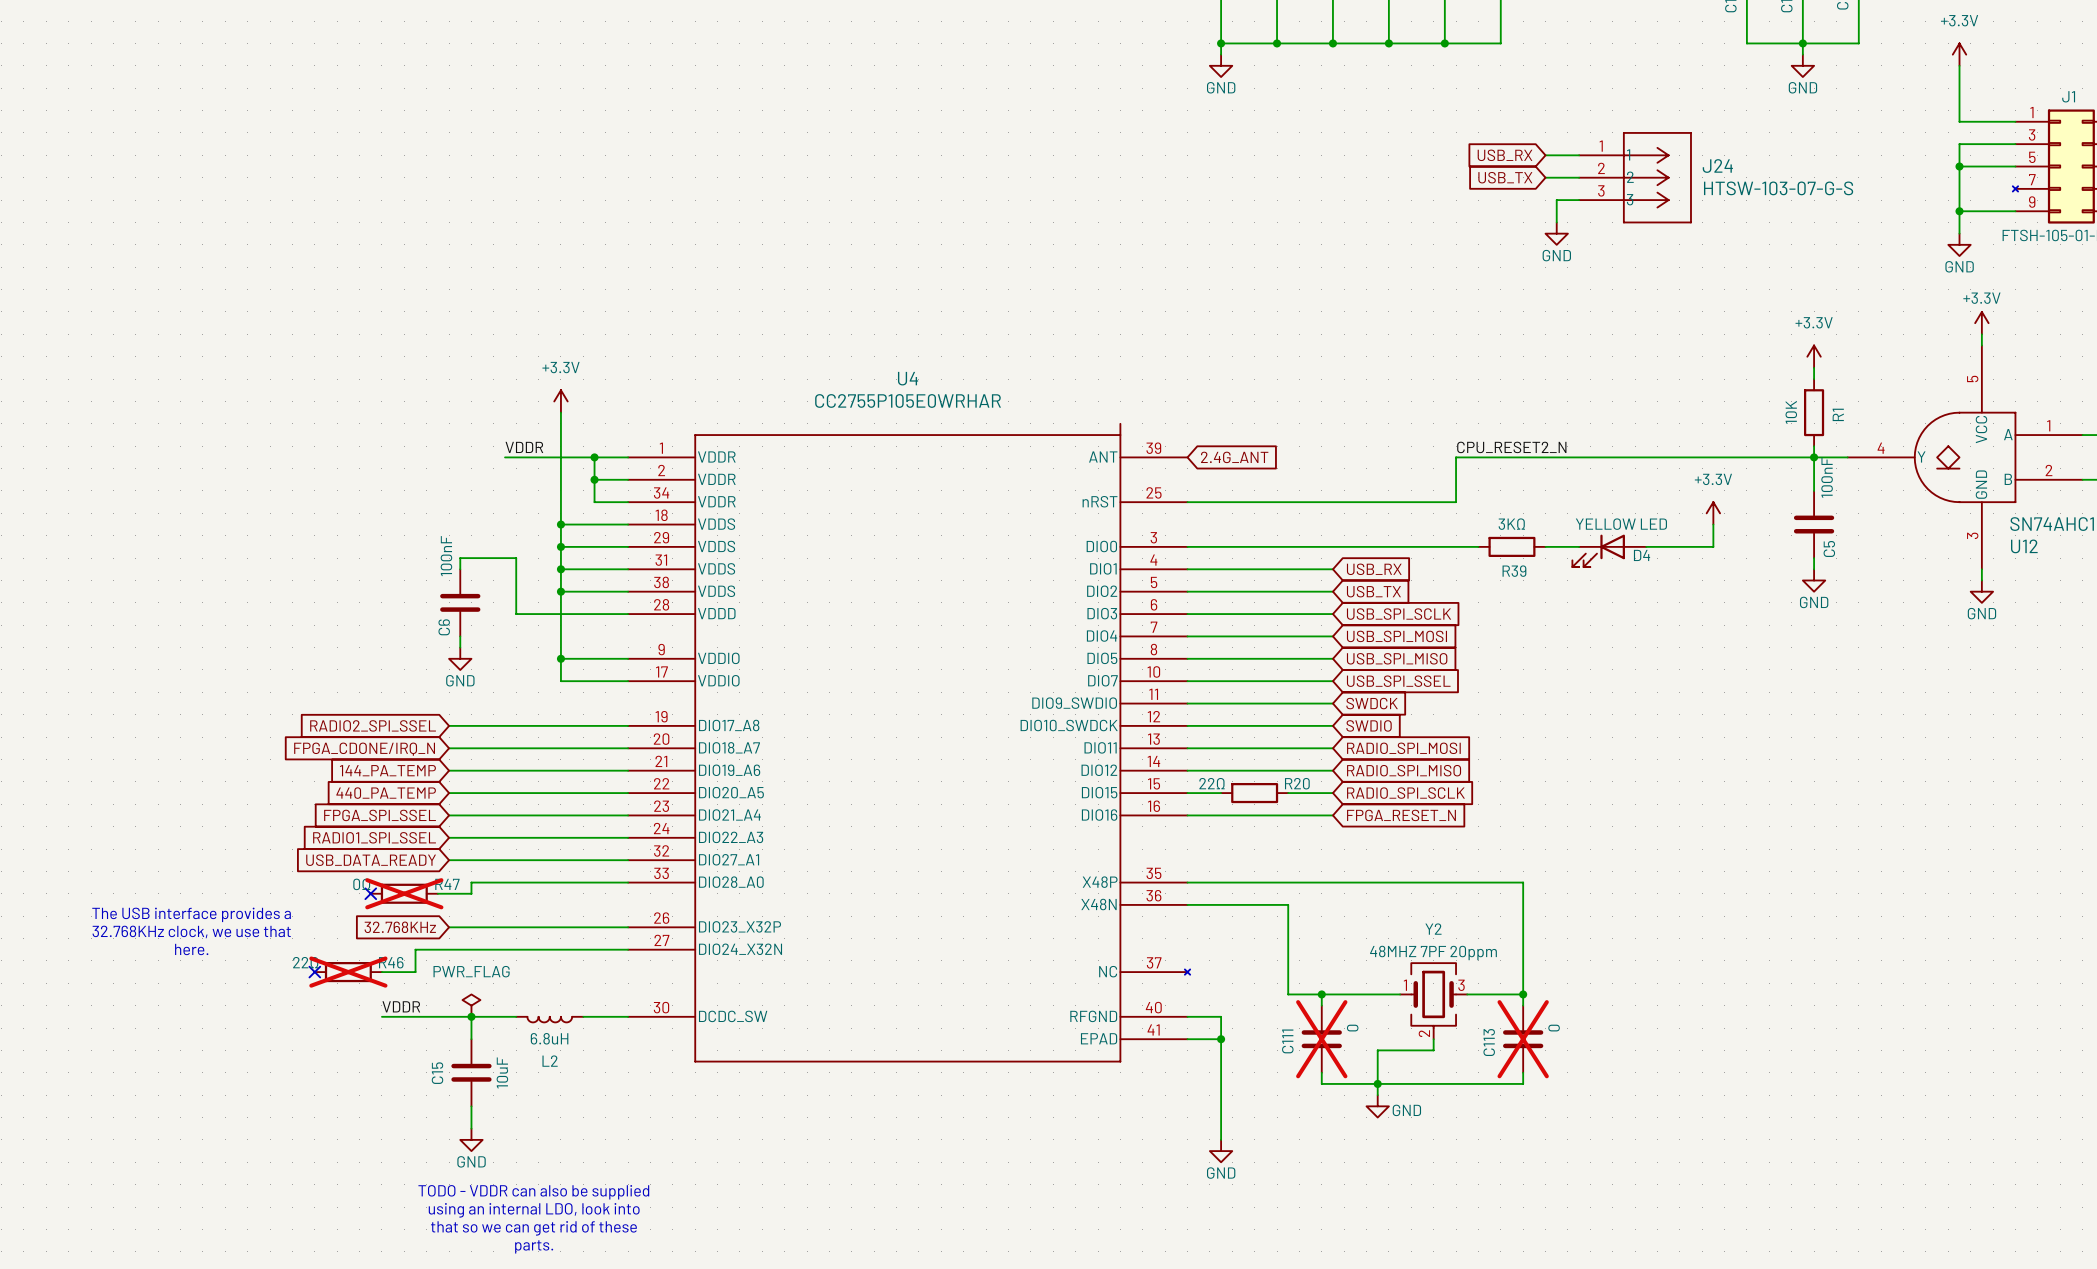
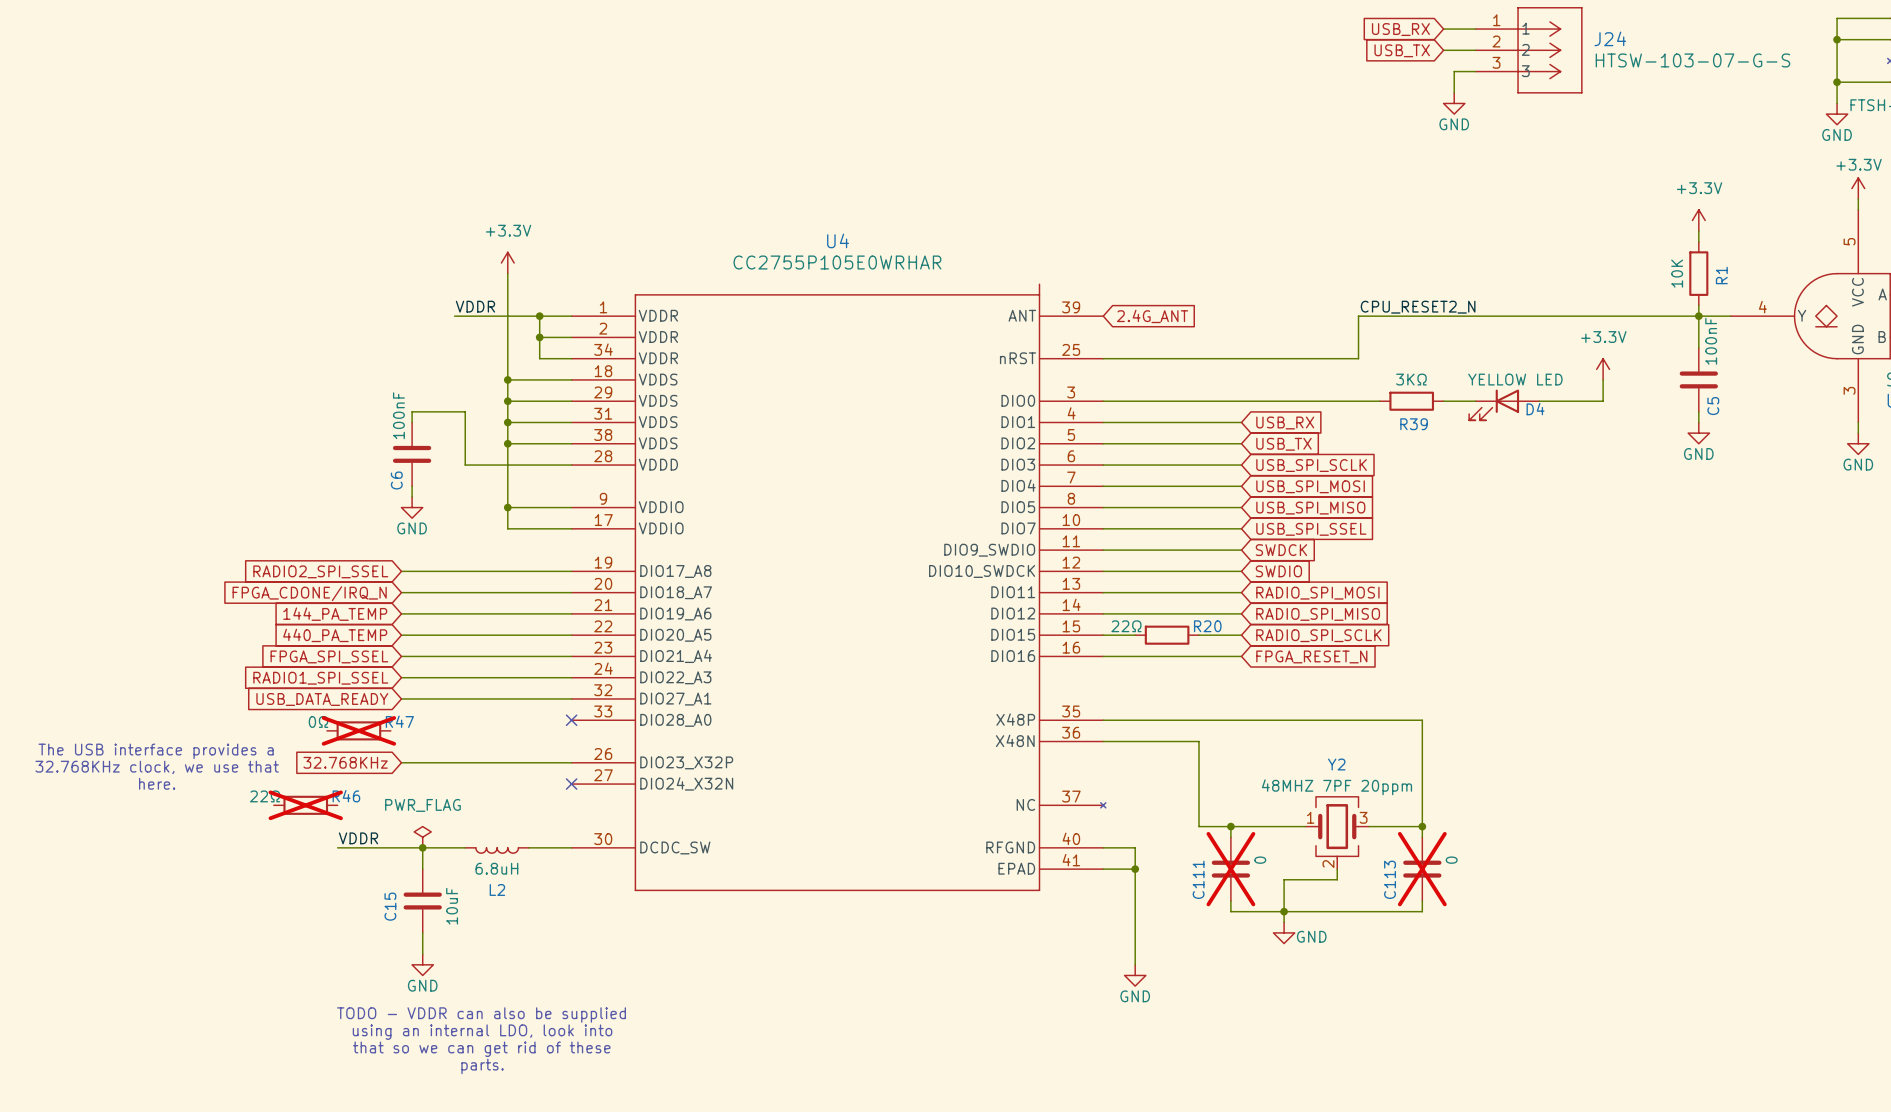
wire: (628, 882) (471, 882) (471, 893) (437, 893) -> none
no-connect mark: none -> (571, 720)
no-connect mark: (370, 893) -> none
wire: (628, 949) (415, 949) (415, 972) (381, 972) -> none
no-connect mark: none -> (571, 784)
no-connect mark: (314, 972) -> none

